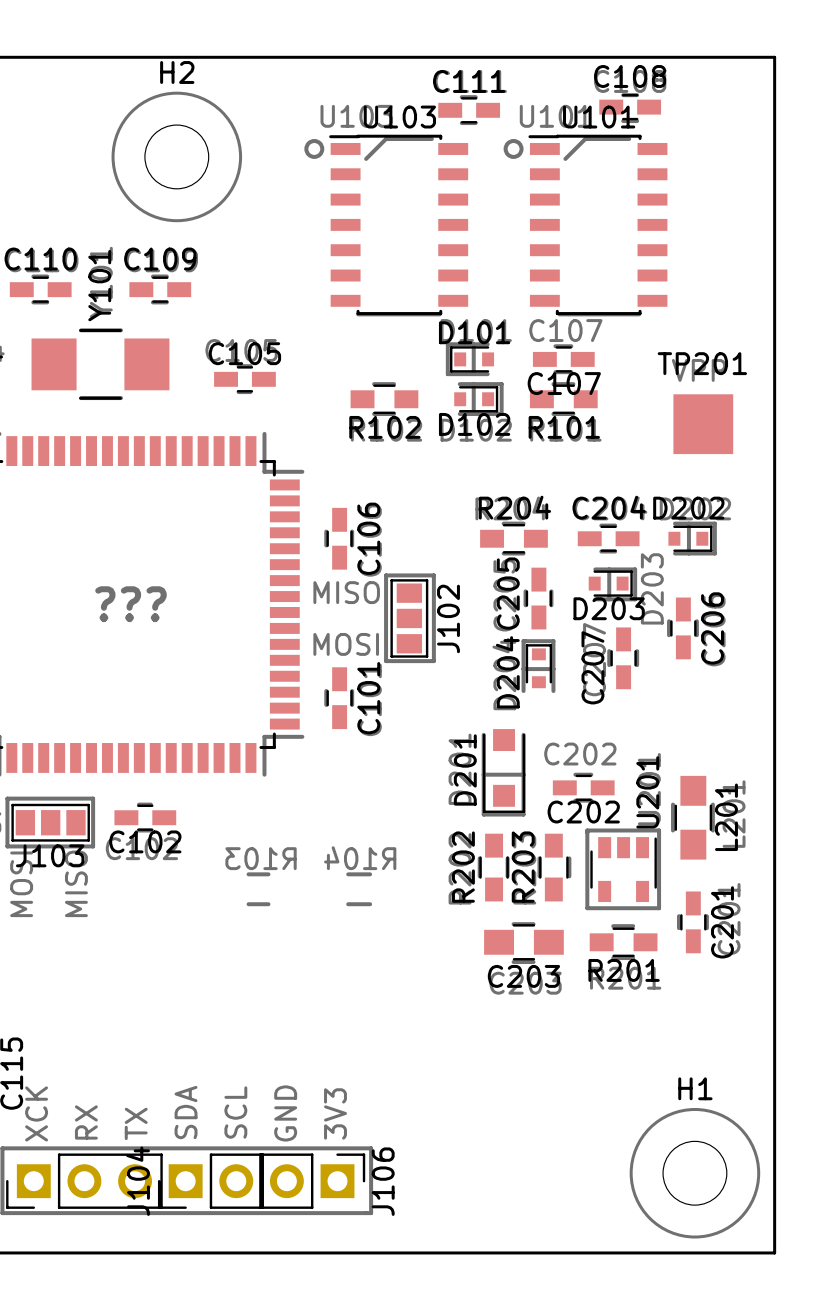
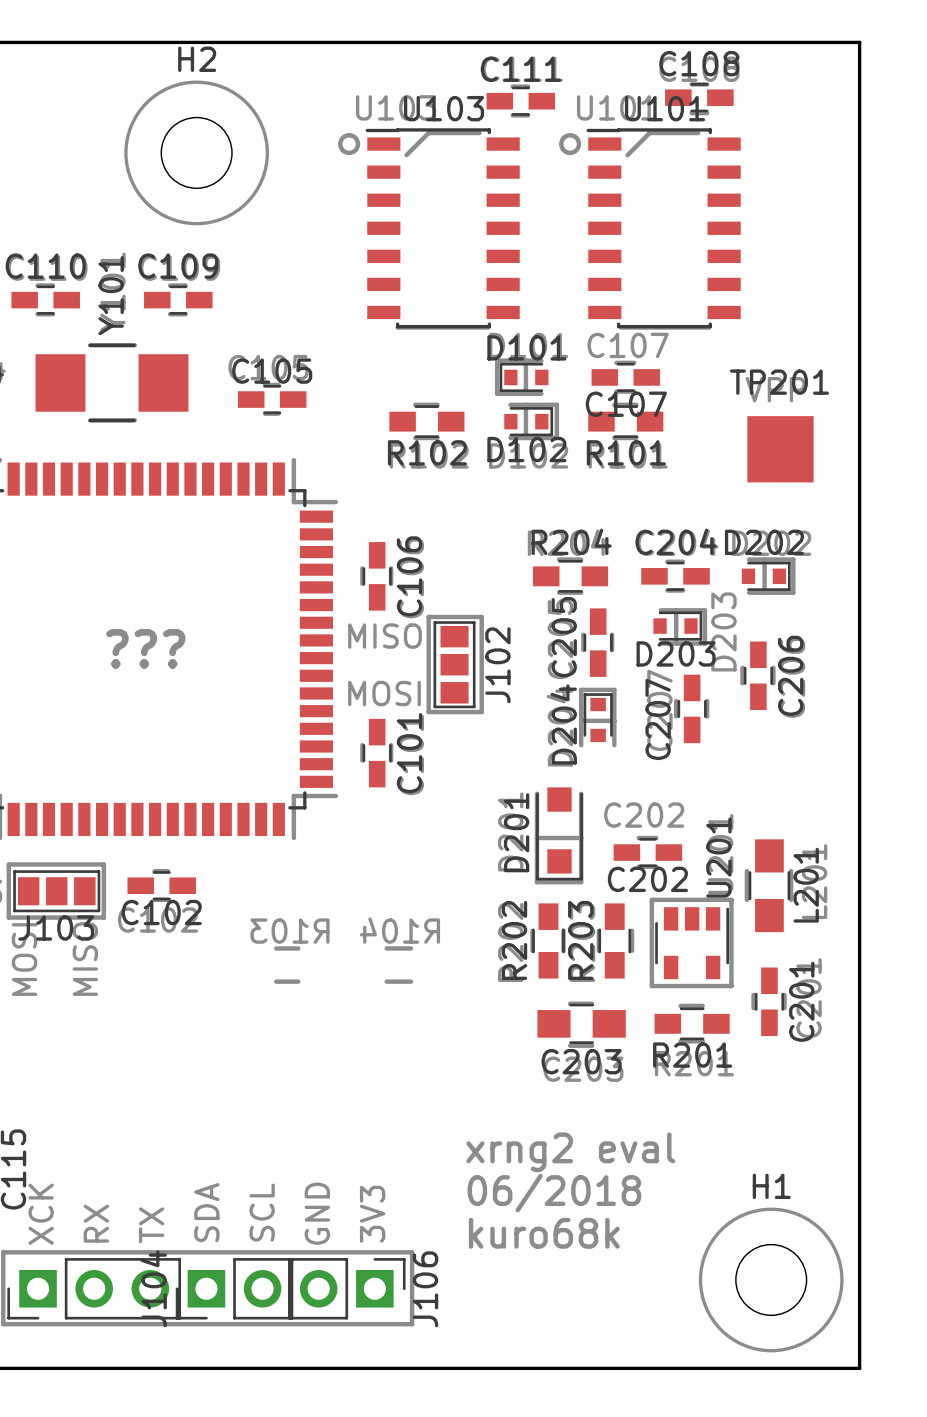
text: none -> xrng2 eval (570, 1152)
text: none -> 06/2018 (554, 1193)
text: none -> kuro68k (544, 1233)

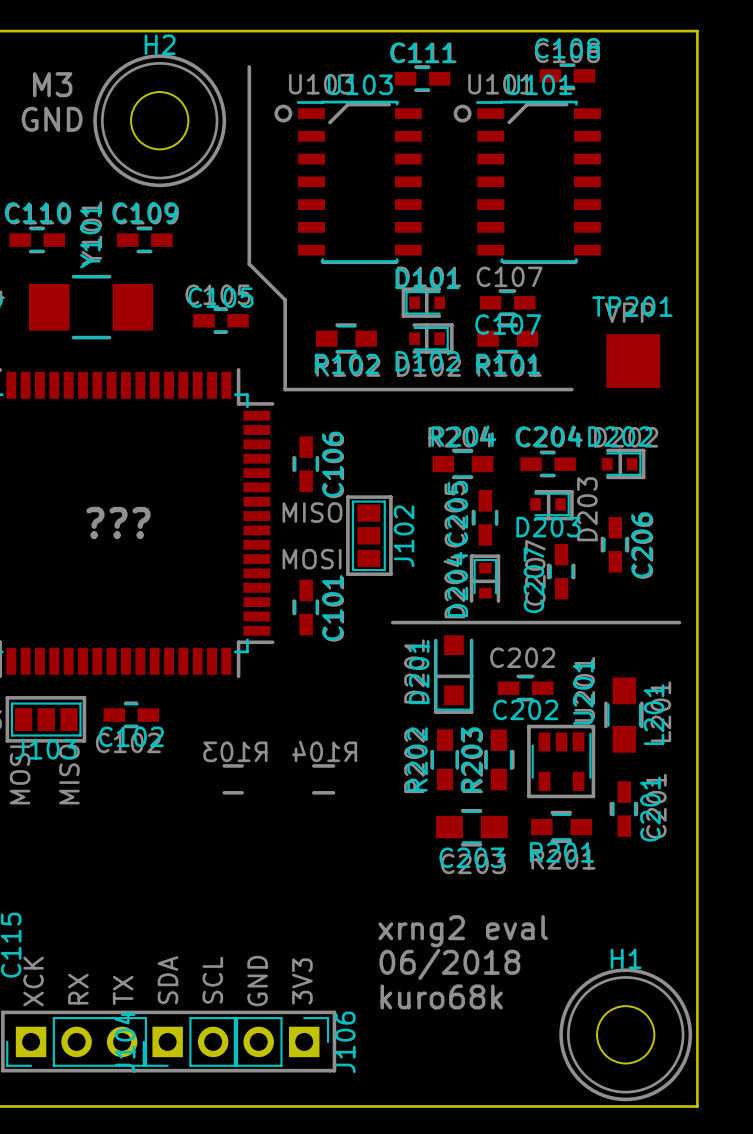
drawing: none -> [93, 54, 227, 188]
line: none -> (249, 66) (249, 264) (285, 299) (285, 389) (571, 389)
text: none -> M3 (52, 84)
text: none -> GND (52, 119)
line: none -> (392, 622) (679, 622)
drawing: none -> [559, 968, 693, 1102]

